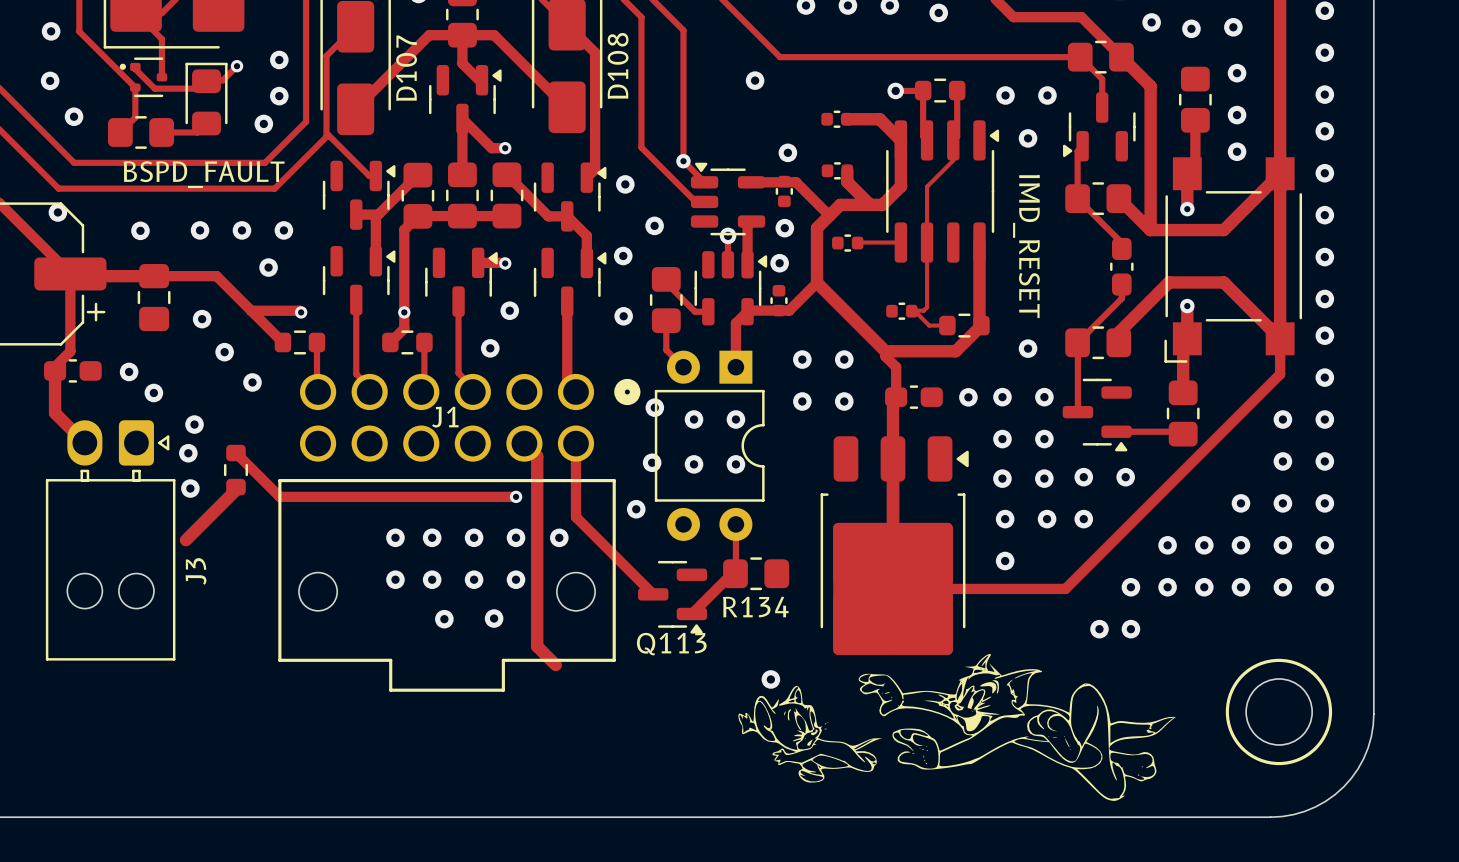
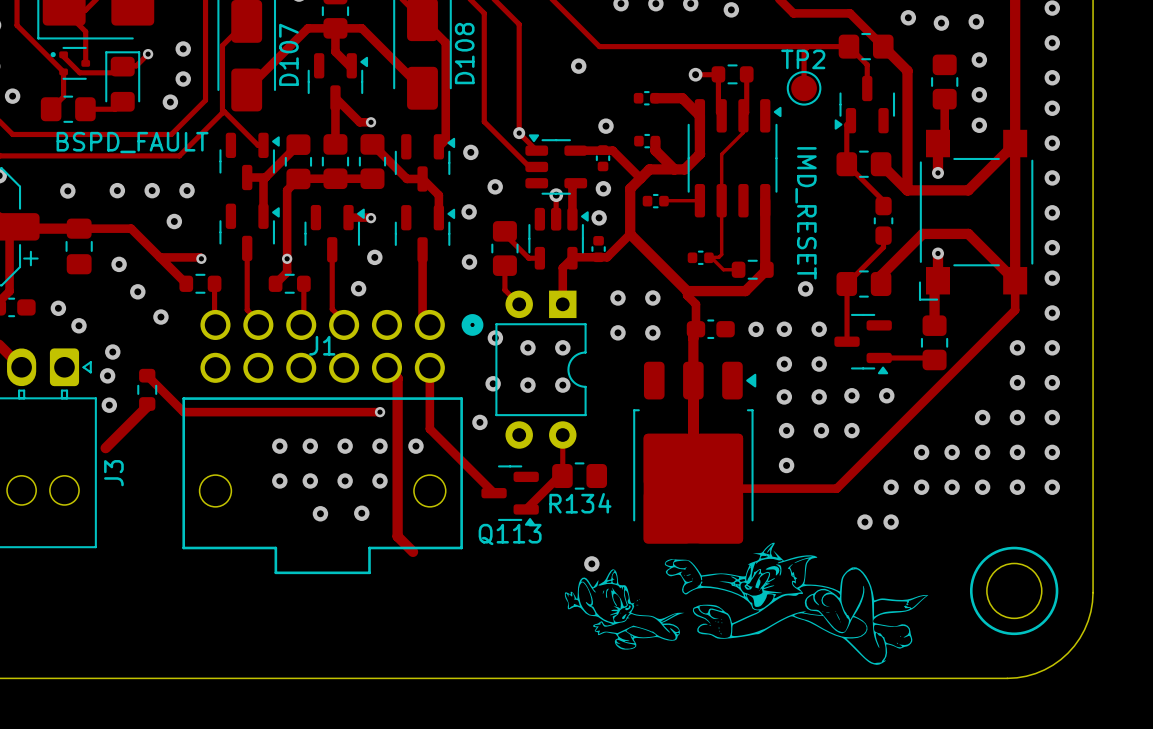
track: none -> (808, 46) (804, 50) (804, 88)
via: (1005, 95) -> none
via: (1047, 95) -> none
TP2: none -> (804, 88)
via: (1028, 138) -> none

